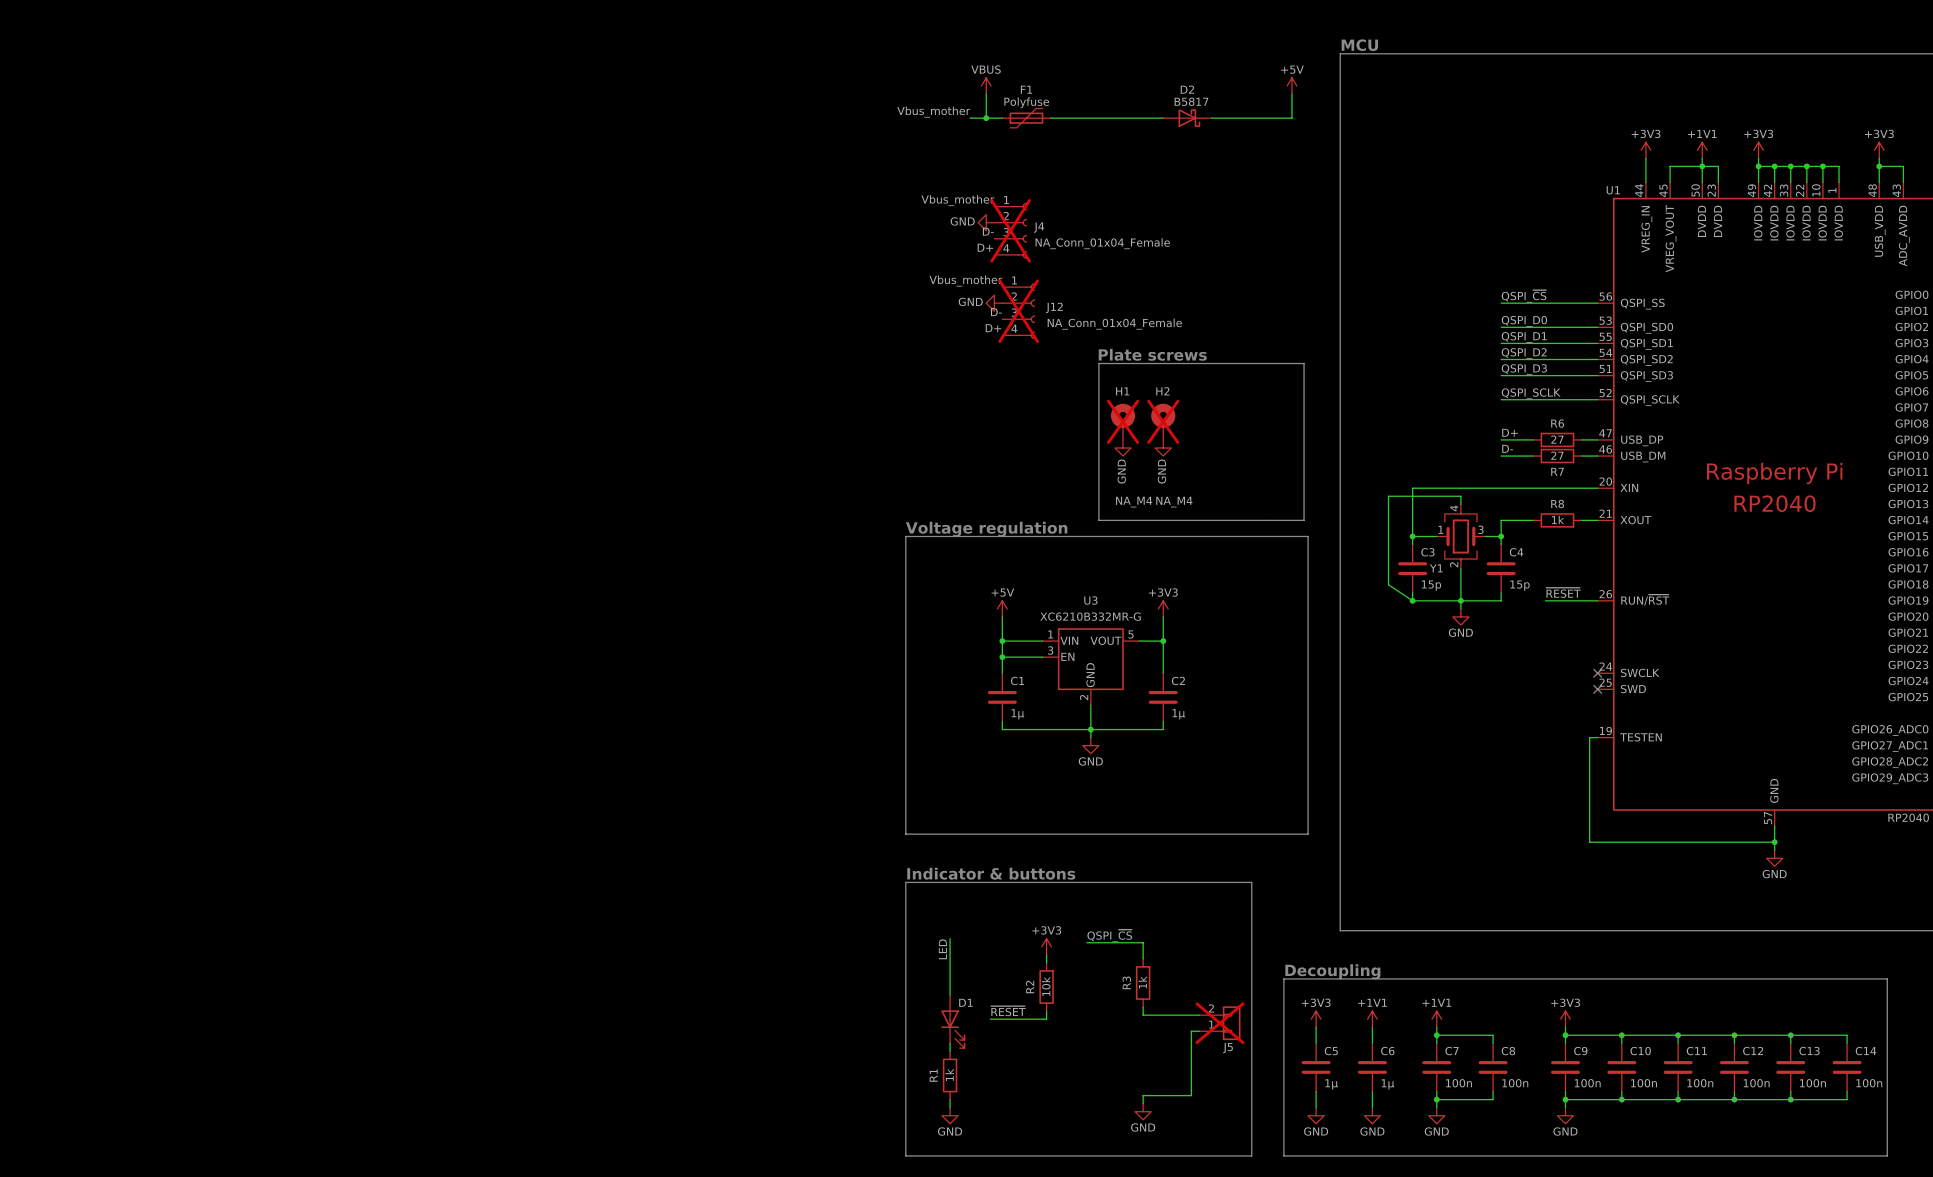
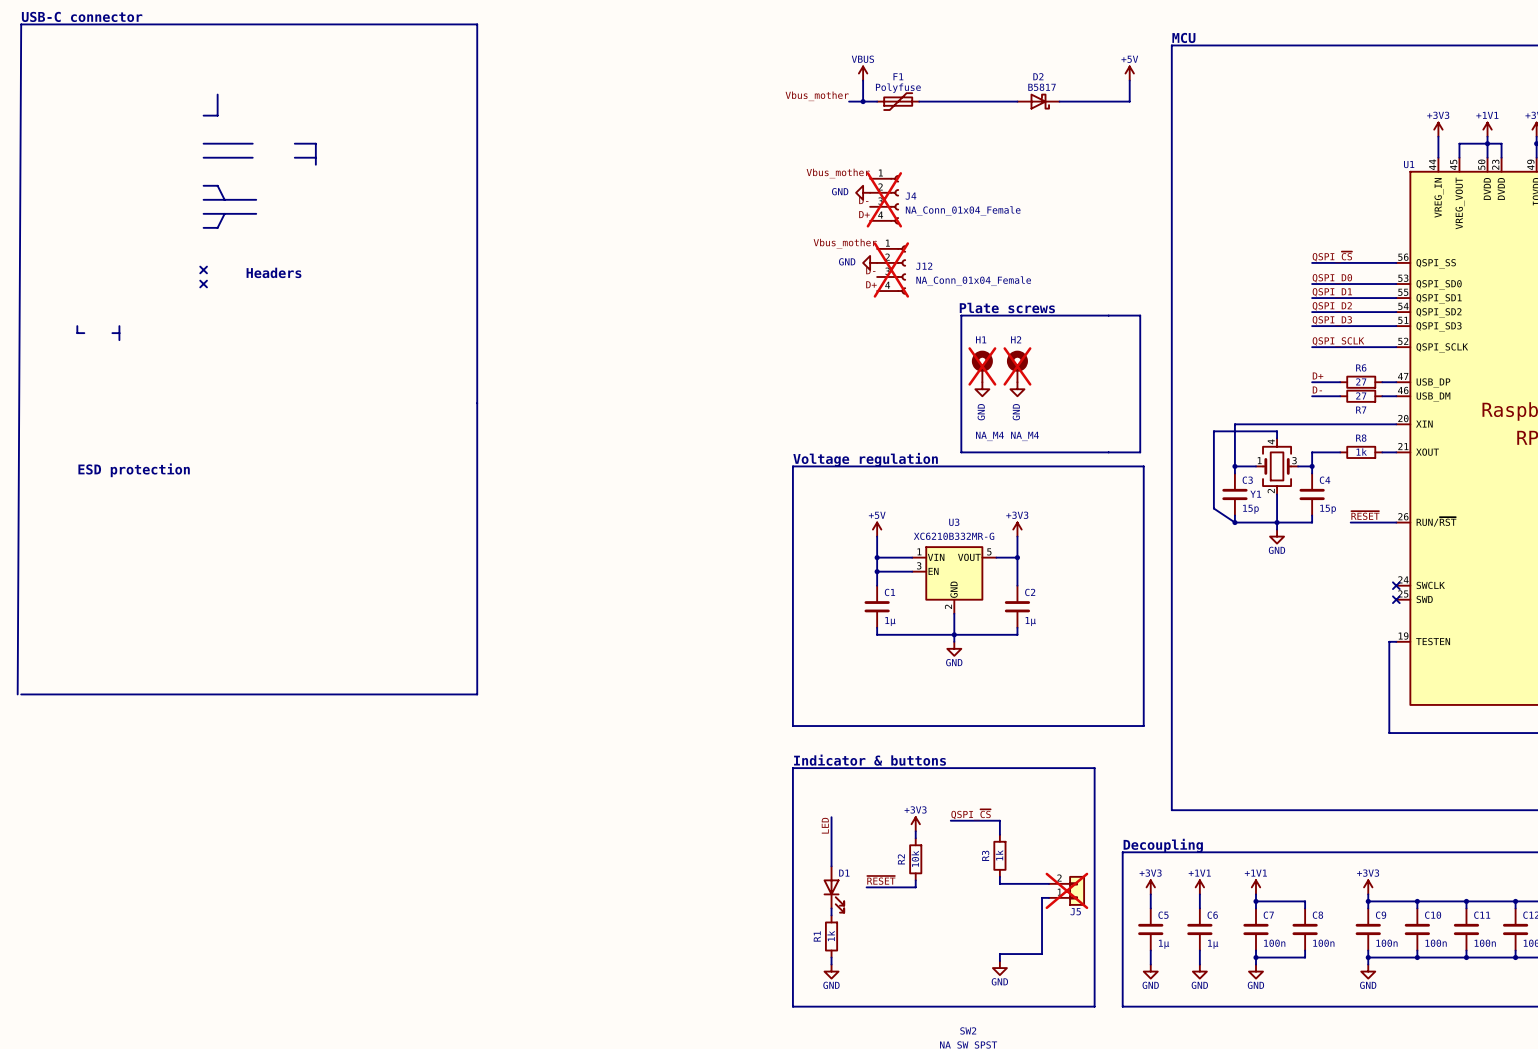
text: none -> USB-C connector (82, 16)
wire: none -> (217, 94) (217, 115) (203, 115)
wire: none -> (203, 143) (252, 143)
wire: none -> (294, 143) (315, 143) (315, 164)
wire: none -> (203, 157) (252, 157)
wire: none -> (294, 157) (315, 157)
wire: none -> (203, 185) (217, 185) (224, 199)
wire: none -> (203, 199) (256, 199)
wire: none -> (203, 213) (256, 213)
wire: none -> (224, 213) (217, 227) (203, 227)
no-connect mark: none -> (203, 269)
text: none -> Headers (273, 272)
no-connect mark: none -> (203, 284)
wire: none -> (77, 326) (77, 333) (84, 333)
wire: none -> (119, 326) (119, 340)
wire: none -> (112, 333) (119, 333)
text: none -> ESD protection (134, 470)
line: none -> (17, 694) (21, 24) (477, 24) (477, 694) (21, 694)

